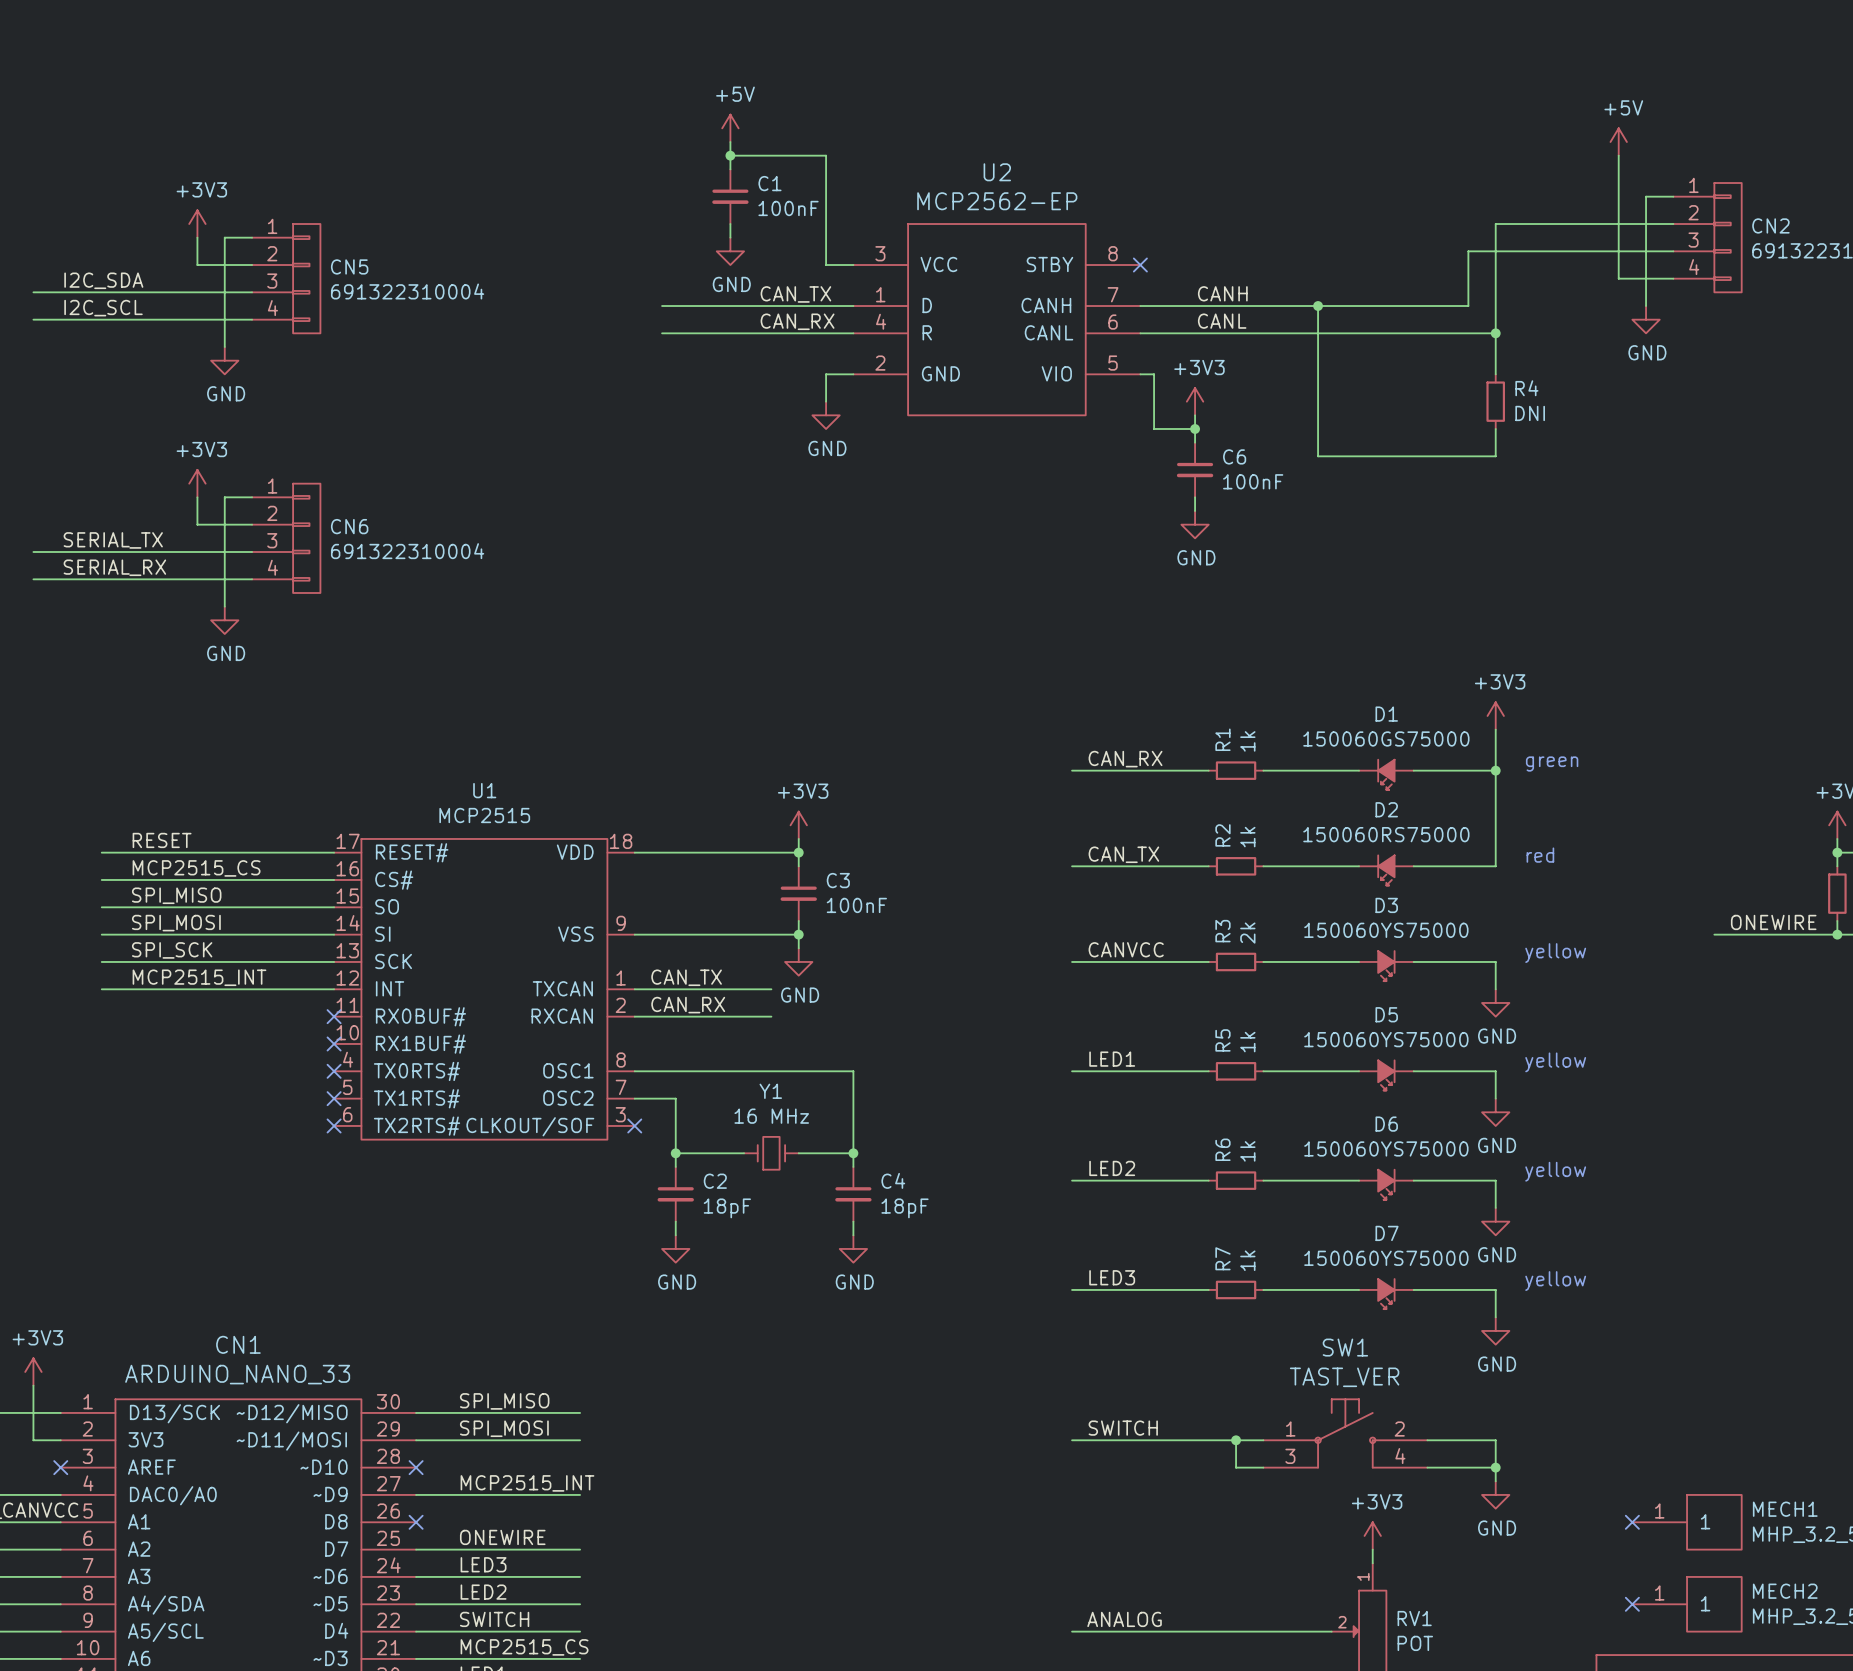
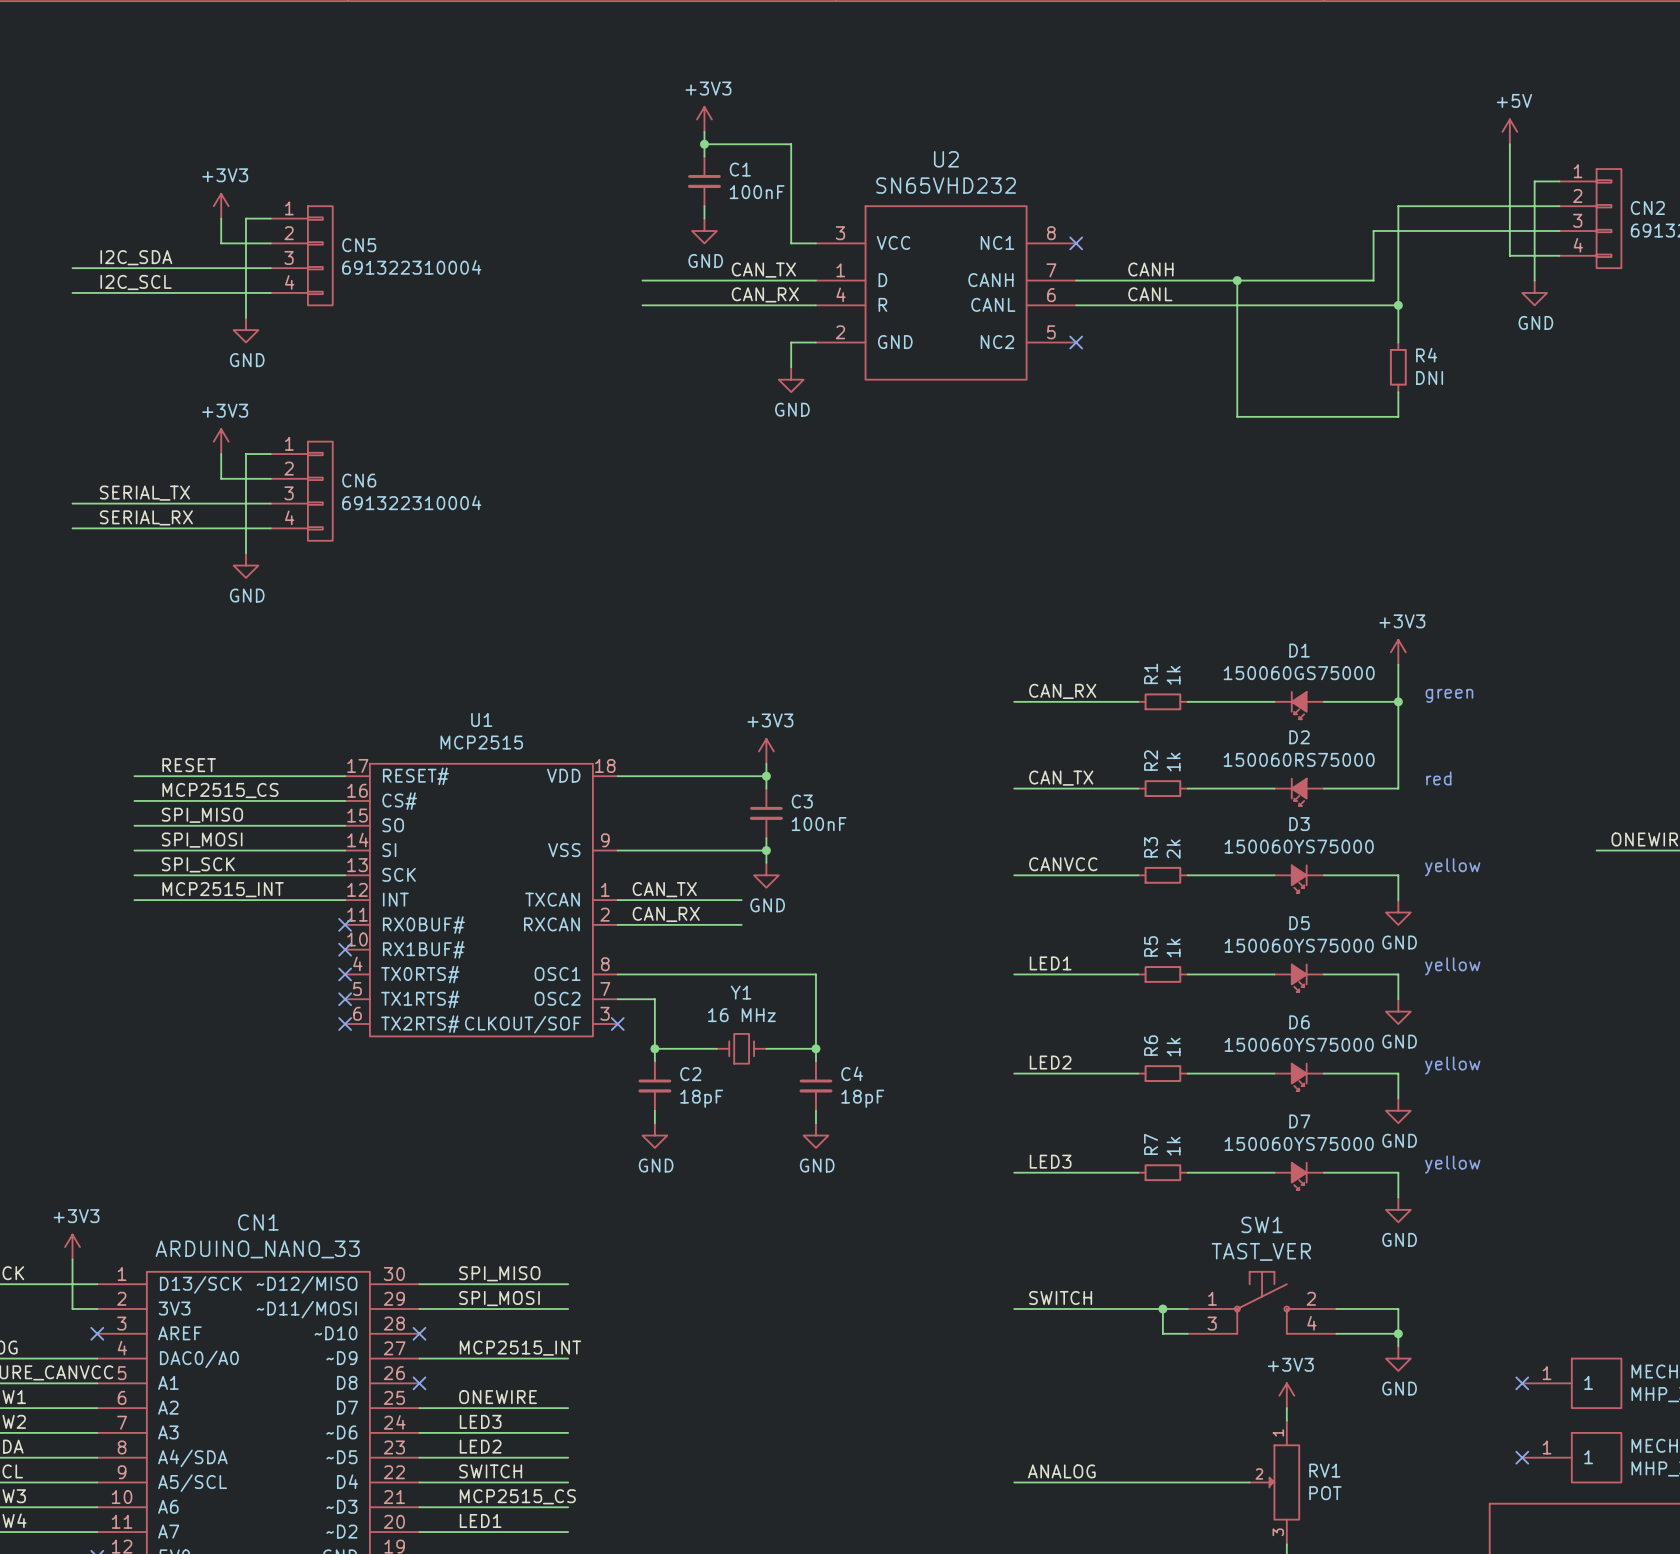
power symbol: +5V (730, 128) -> +3V3 (704, 119)
U2 value: MCP2562-EP (997, 201) -> SN65VHD232 (946, 185)
U2 pin name: STBY (1049, 264) -> NC1 (997, 242)
U2 pin name: VIO (1056, 373) -> NC2 (997, 342)
wire: (1140, 374) (1154, 374) (1154, 429) (1195, 429) -> none
no-connect mark: none -> (1076, 342)
power symbol: +3V3 (1195, 401) -> none
wire: (1195, 415) (1195, 442) -> none
junction: (1195, 429) -> none
C6: 100nF (1195, 469) -> none
wire: (1195, 497) (1195, 510) -> none
power symbol: GND (1195, 524) -> none

